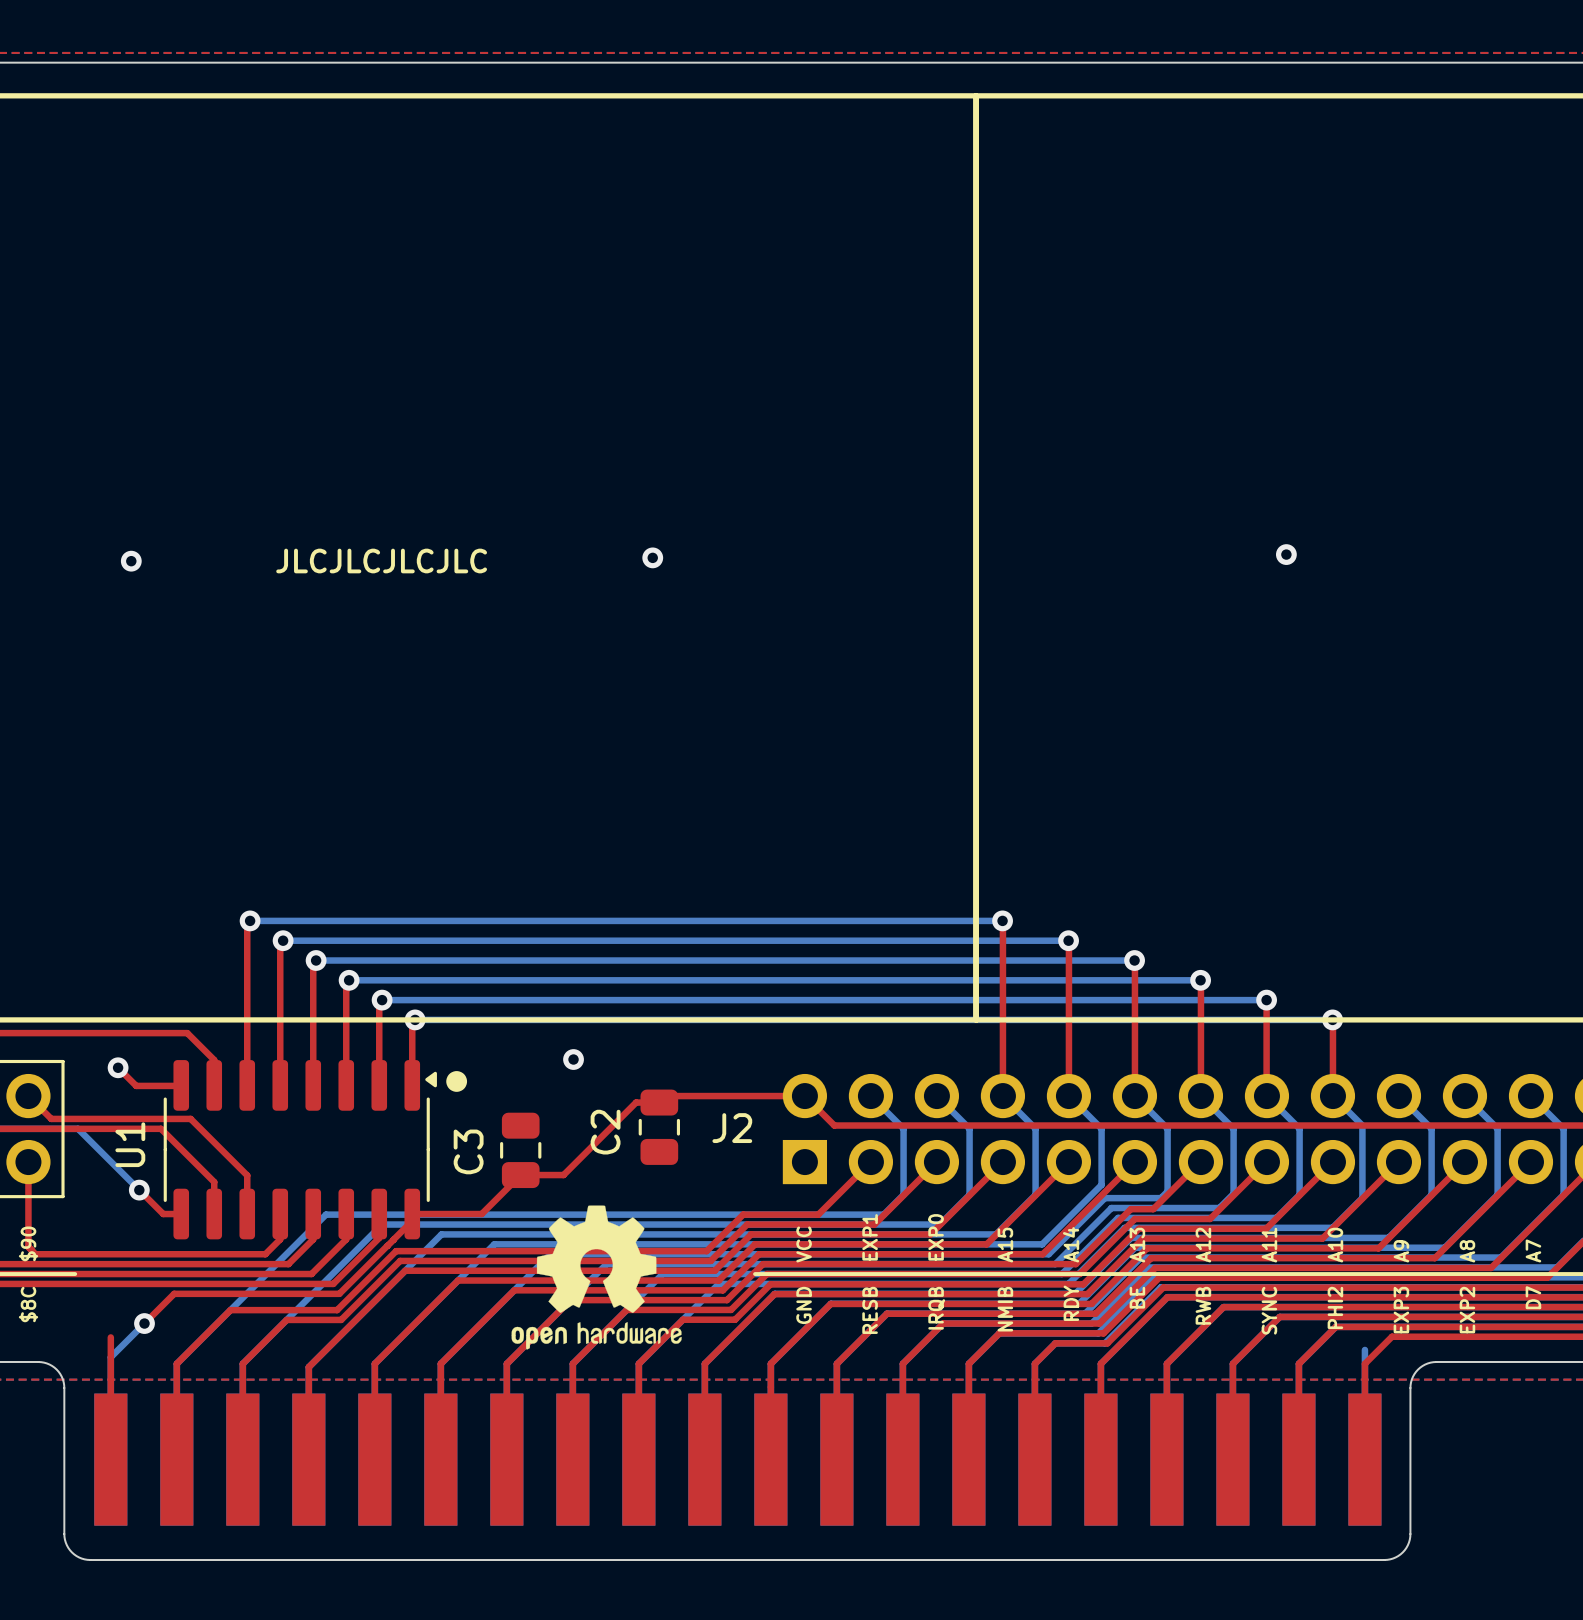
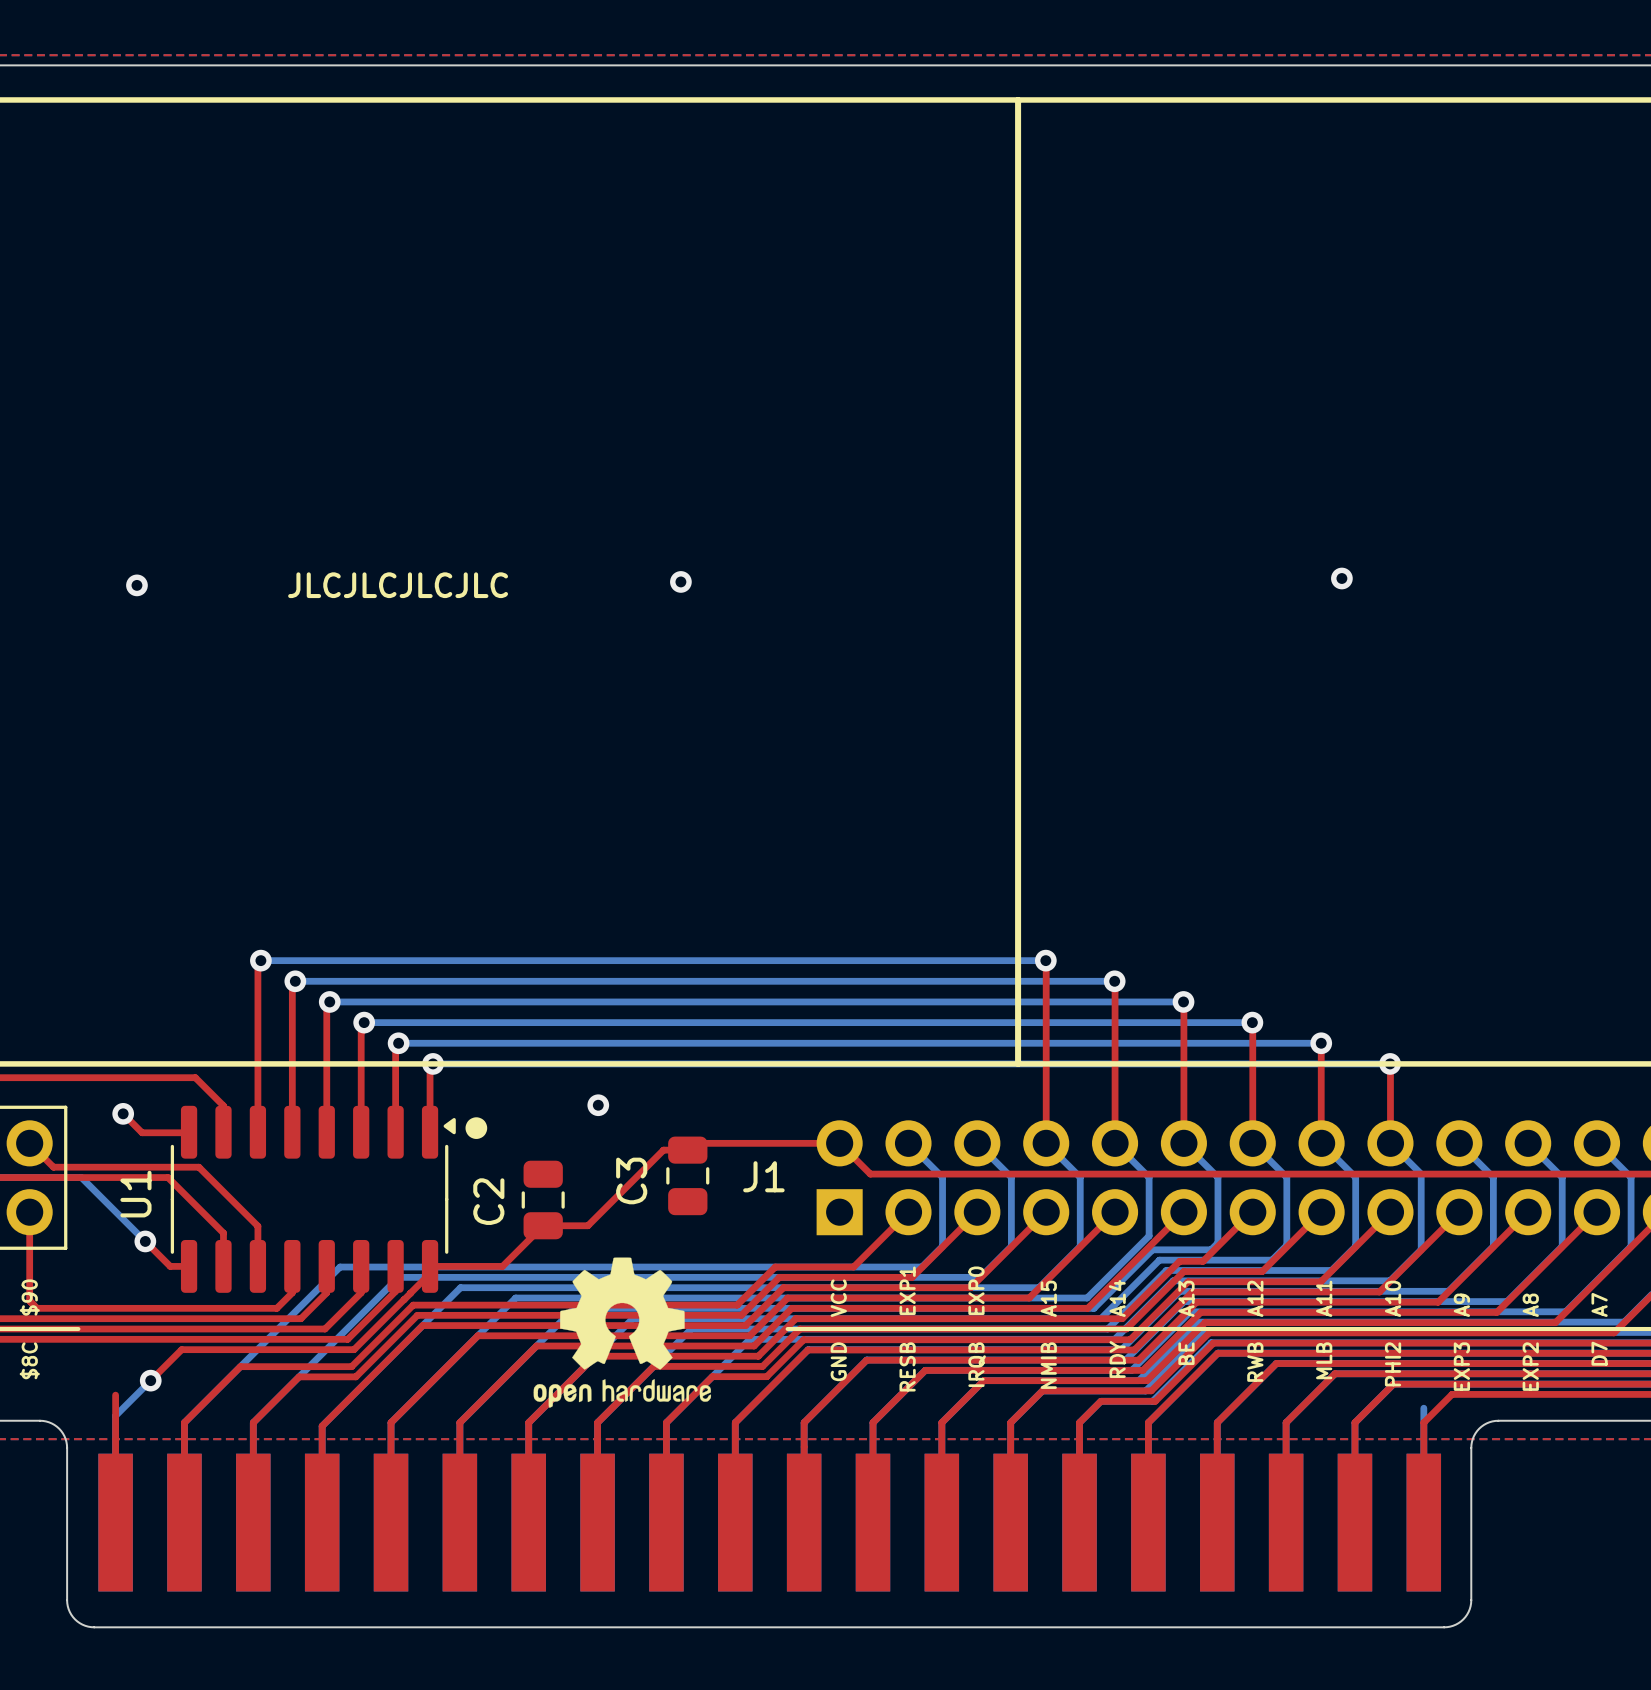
J2 name: J2 (732, 1128) -> J1 (763, 1176)
C2 name: C2 (605, 1132) -> C3 (631, 1180)
C3 name: C3 (468, 1151) -> C2 (488, 1201)
text: SYNC (1269, 1310) -> MLB (1324, 1360)

